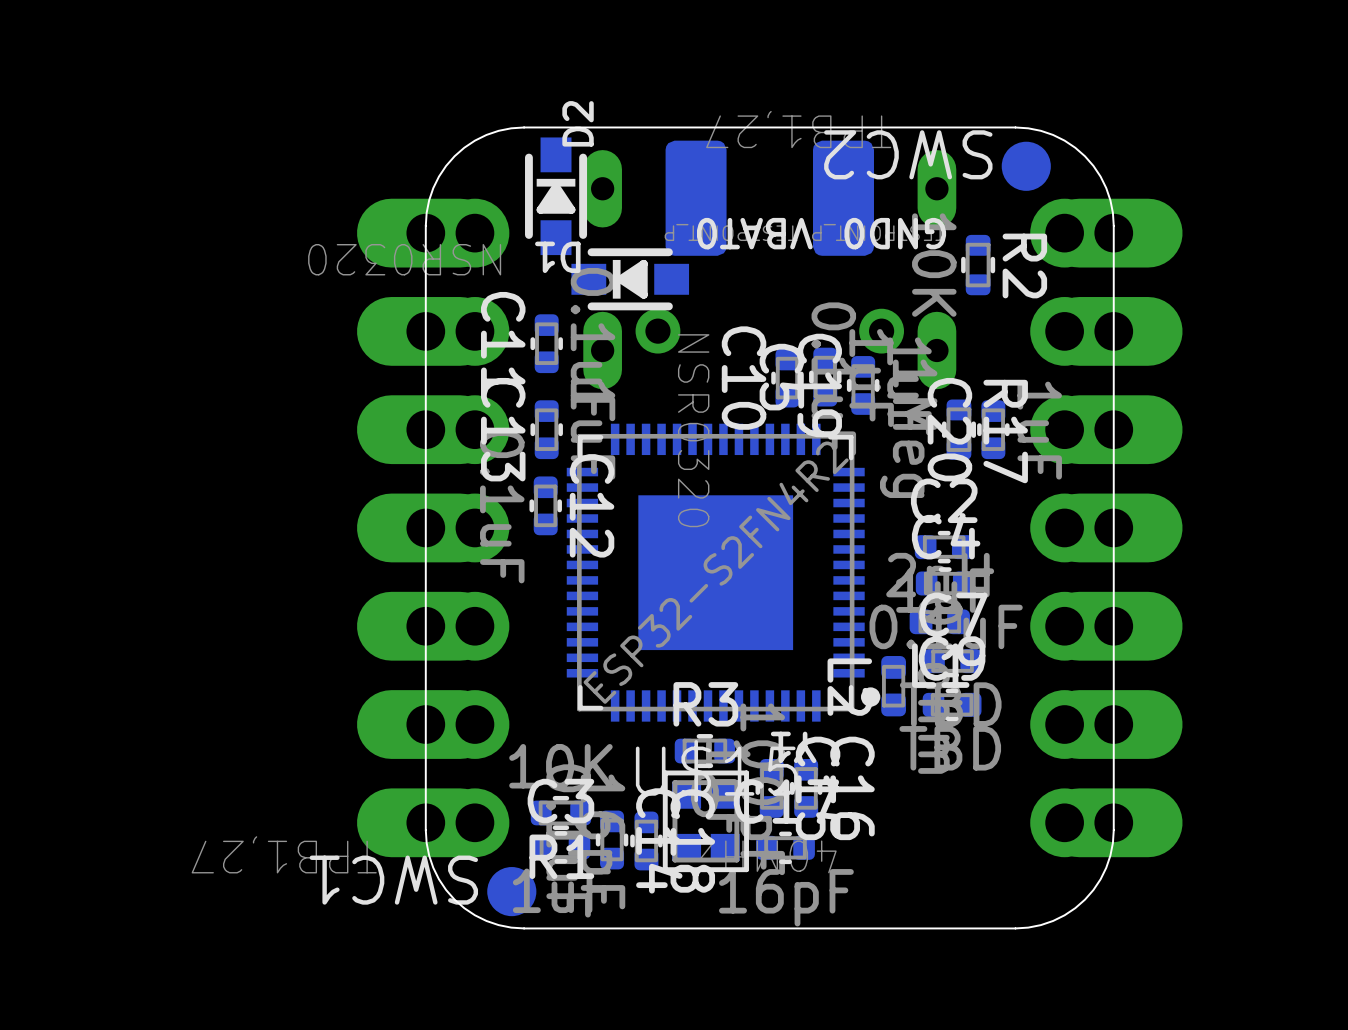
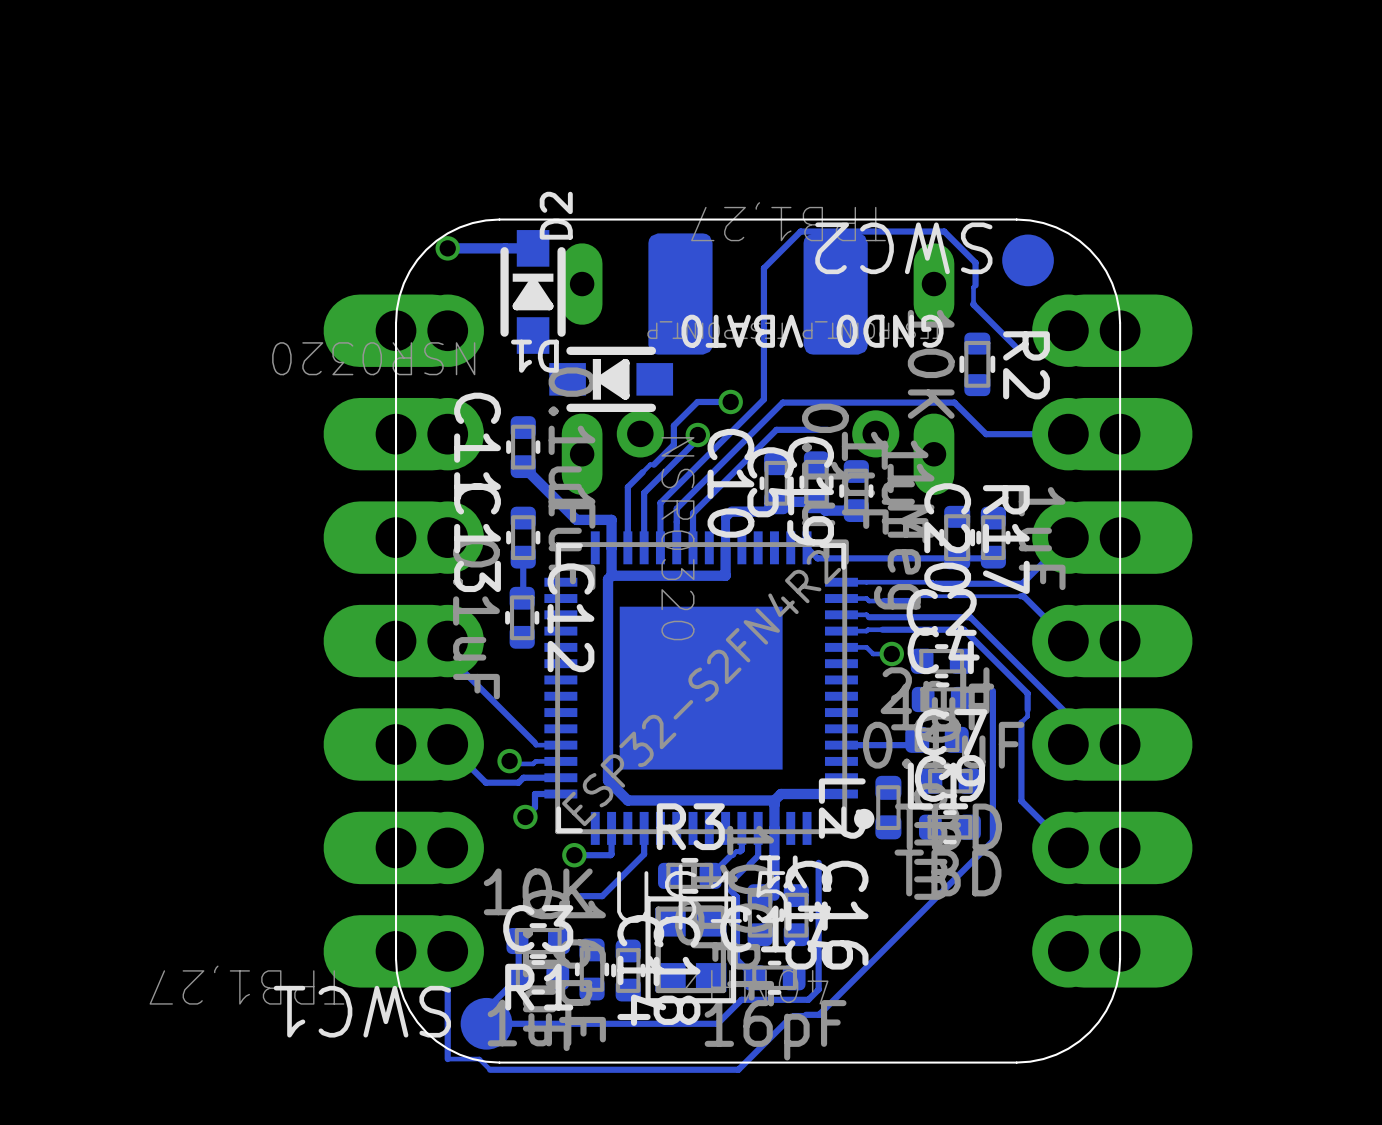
via: none -> (447, 248)
track: none -> (533, 248) (447, 248)
track: none -> (1015, 346) (973, 304) (975, 262) (944, 231) (800, 231) (763, 268) (763, 399) (660, 502) (660, 547)
track: none -> (730, 401) (697, 401) (673, 425) (673, 444) (627, 487) (627, 547)
via: none -> (730, 401)
track: none -> (827, 429) (776, 429) (693, 513) (693, 547)
track: none -> (1120, 434) (986, 434) (954, 402) (782, 402) (676, 508) (676, 547)
track: none -> (697, 435) (697, 439) (644, 492) (644, 547)
via: none -> (697, 435)
track: none -> (523, 466) (576, 519) (611, 519) (611, 575)
track: none -> (856, 510) (825, 510) (816, 501) (777, 501) (767, 511) (731, 511) (725, 517) (725, 575) (611, 575)
track: none -> (1120, 537) (1068, 537) (1022, 583) (934, 584) (932, 582) (841, 582)
track: none -> (807, 547) (817, 558) (993, 557)
track: none -> (523, 557) (523, 598)
track: none -> (611, 575) (608, 579) (608, 780) (627, 800) (774, 800) (774, 895)
track: none -> (841, 598) (866, 598) (869, 601) (911, 601) (916, 596) (1023, 596) (1068, 641) (1120, 641)
track: none -> (841, 614) (866, 614) (868, 617) (970, 617) (1068, 715) (1068, 744) (1120, 744)
track: none -> (841, 631) (963, 629) (1027, 693) (1027, 716) (1021, 722) (1021, 800) (1068, 847) (1120, 847)
track: none -> (396, 641) (447, 641) (447, 655) (535, 745) (560, 745)
track: none -> (841, 647) (866, 647) (873, 653) (891, 653)
via: none -> (891, 653)
track: none -> (992, 690) (992, 841) (819, 1014) (793, 1014) (738, 1069) (490, 1069) (479, 1059) (447, 1059) (447, 951) (396, 951)
track: none -> (917, 739) (911, 745) (841, 745)
track: none -> (396, 744) (447, 744) (485, 782) (518, 782) (523, 777) (560, 777)
via: none -> (509, 761)
track: none -> (560, 761) (512, 763)
track: none -> (560, 794) (534, 794) (534, 807) (525, 816)
track: none -> (841, 794) (780, 794) (774, 800)
via: none -> (525, 816)
track: none -> (611, 828) (610, 855) (574, 855)
track: none -> (644, 828) (644, 854) (602, 896) (580, 896)
track: none -> (741, 828) (741, 849) (731, 854) (710, 875)
track: none -> (758, 828) (758, 855) (730, 883) (730, 890) (736, 897) (736, 959) (755, 977)
via: none -> (574, 855)
track: none -> (818, 862) (818, 989) (808, 999) (741, 999) (717, 1023) (486, 1023) (486, 1009) (518, 977) (517, 941)

